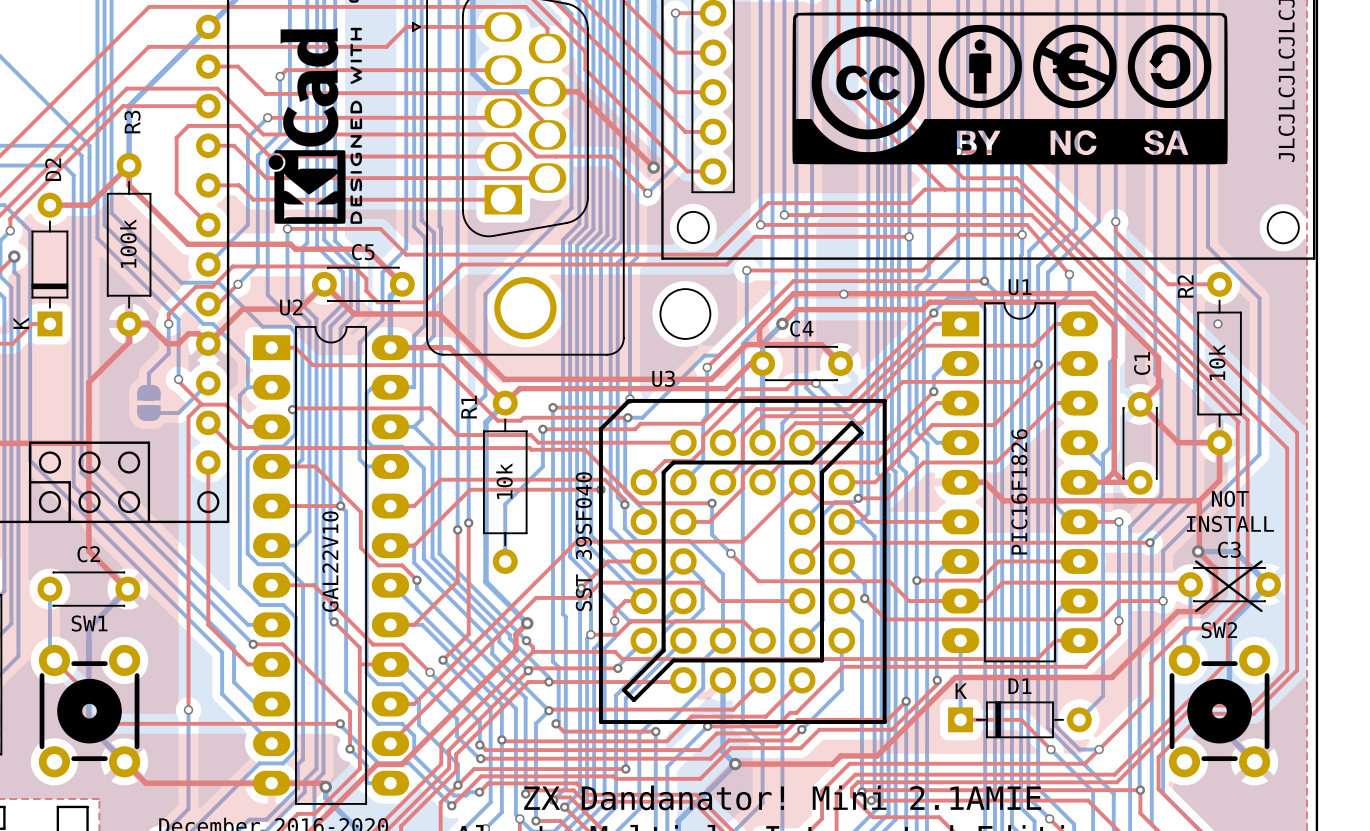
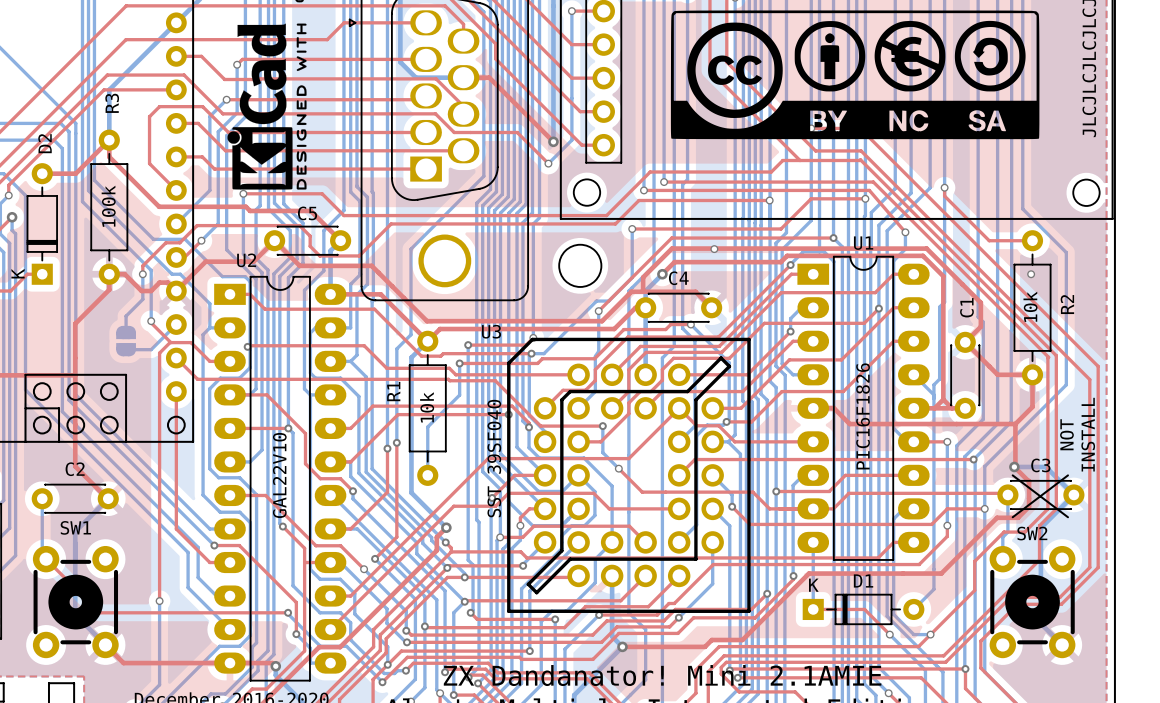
R2 name position: R2 (1185, 286) -> R2 (1067, 304)
U3 name position: U3 (663, 378) -> U3 (491, 331)
R1 name position: R1 (469, 407) -> R1 (393, 391)
text rotation: 0° (1230, 498) -> 90° counterclockwise (1066, 434)
text rotation: 0° (1230, 523) -> 90° counterclockwise (1088, 434)

